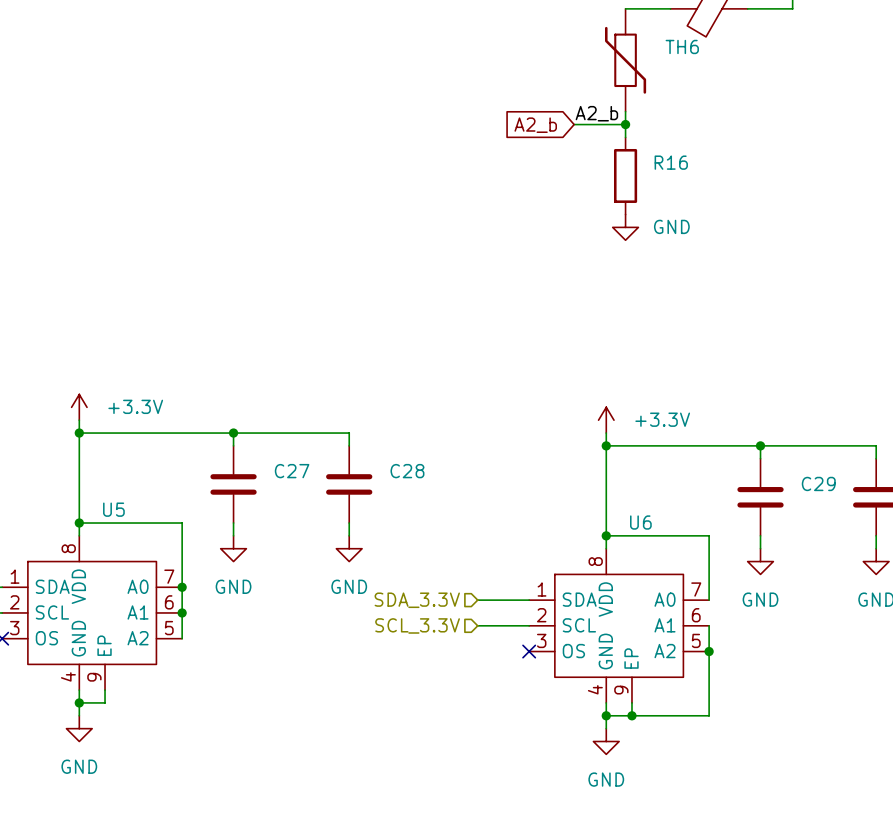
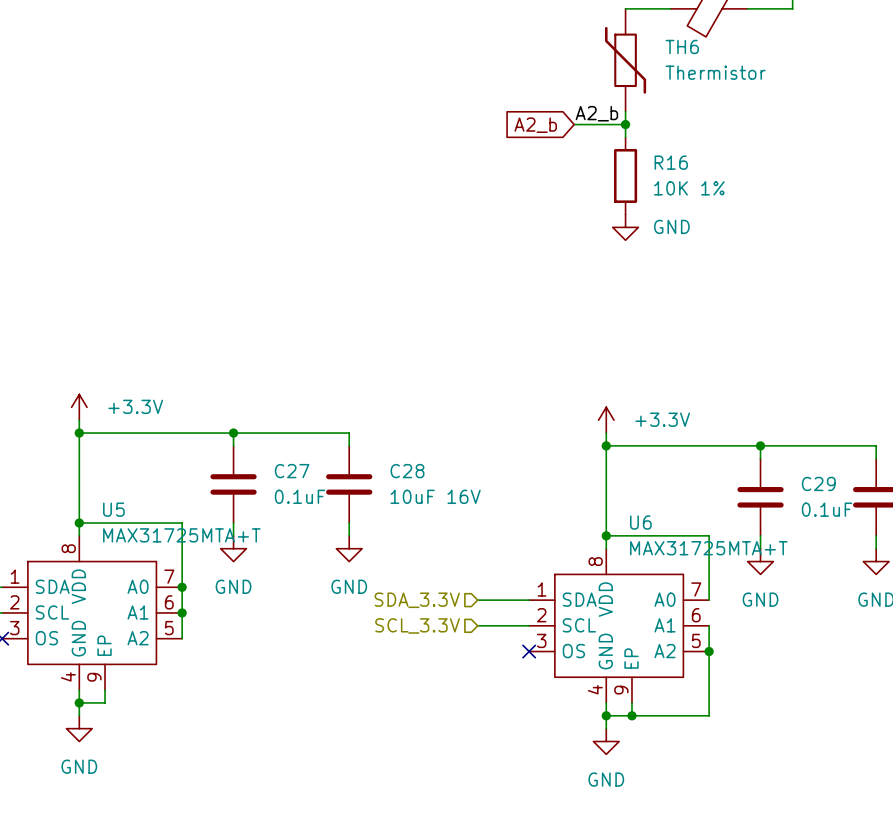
TH6 value: none -> Thermistor (715, 72)
R16 value: none -> 10K 1% (689, 188)
C27 value: none -> 0.1uF (300, 496)
C28 value: none -> 10uF 16V (435, 496)
C29 value: none -> 0.1uF (827, 509)
U5 value: none -> MAX31725MTA+T (181, 535)
U6 value: none -> MAX31725MTA+T (708, 548)

